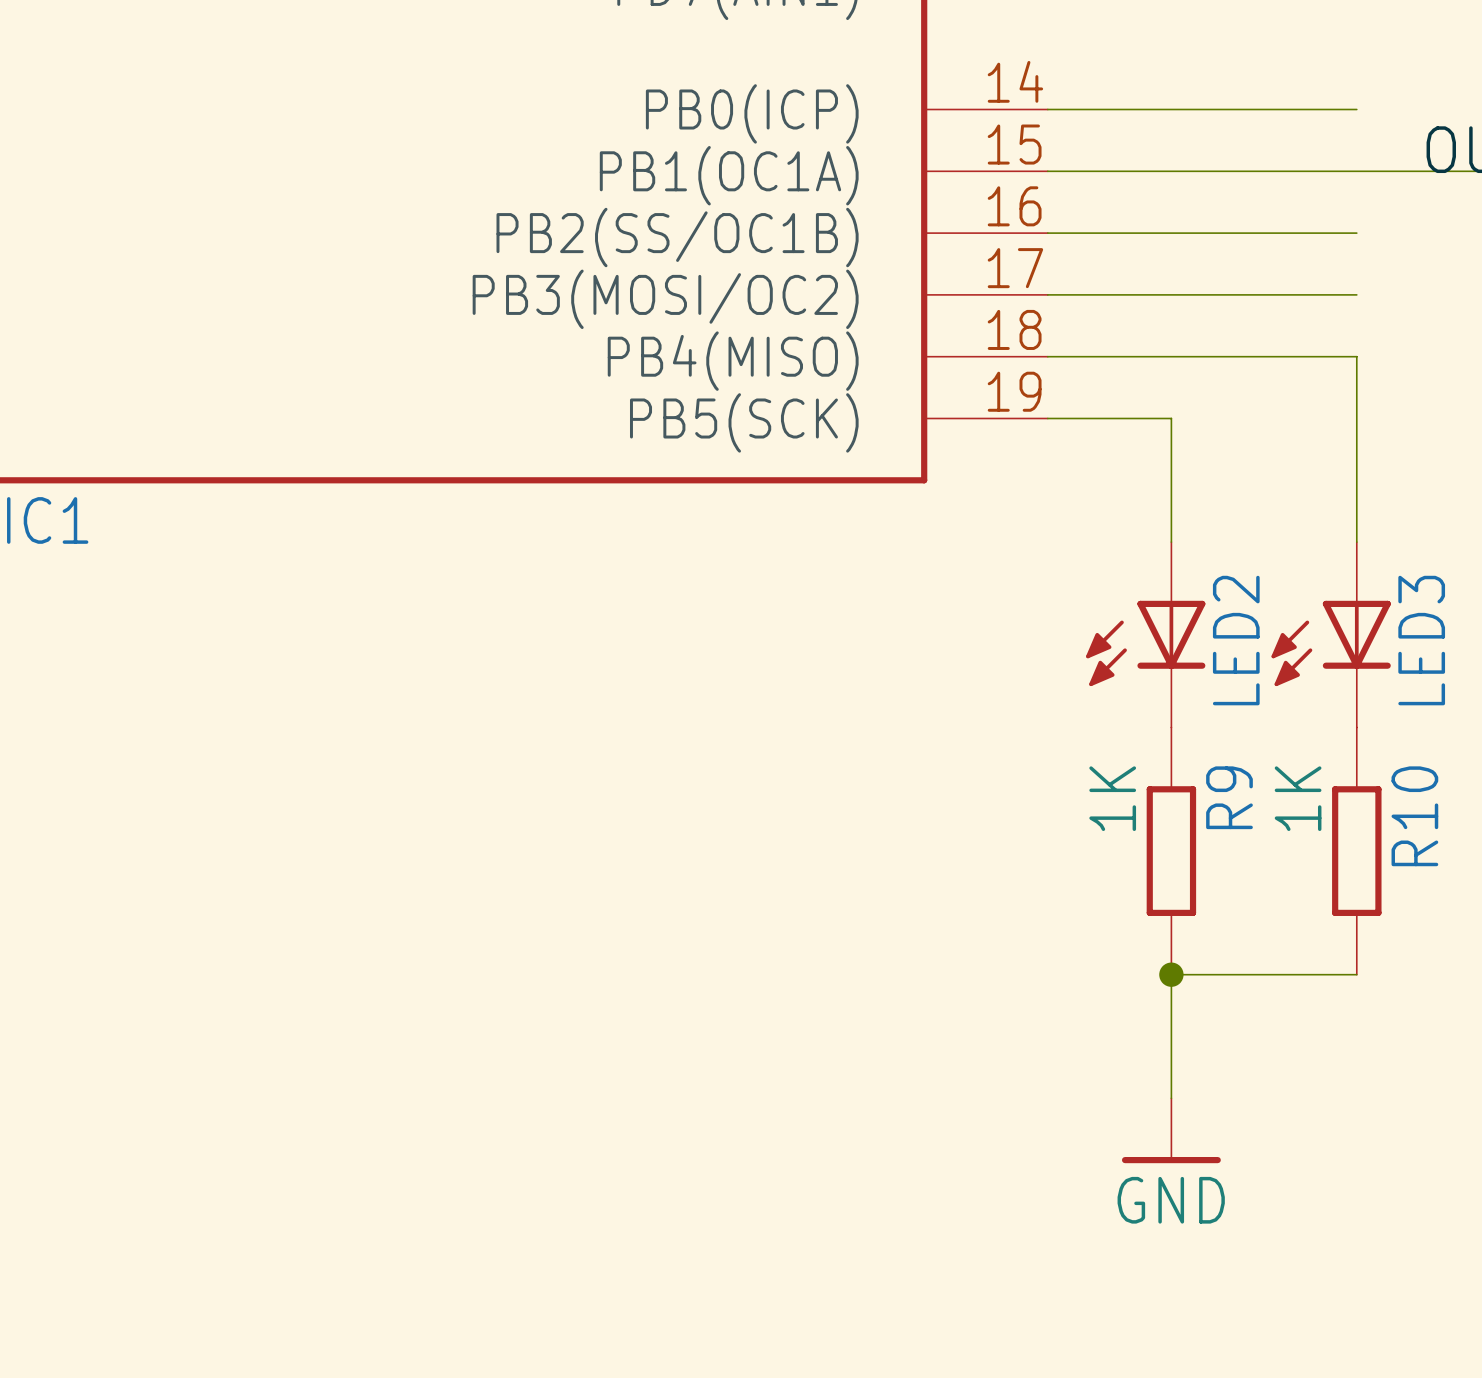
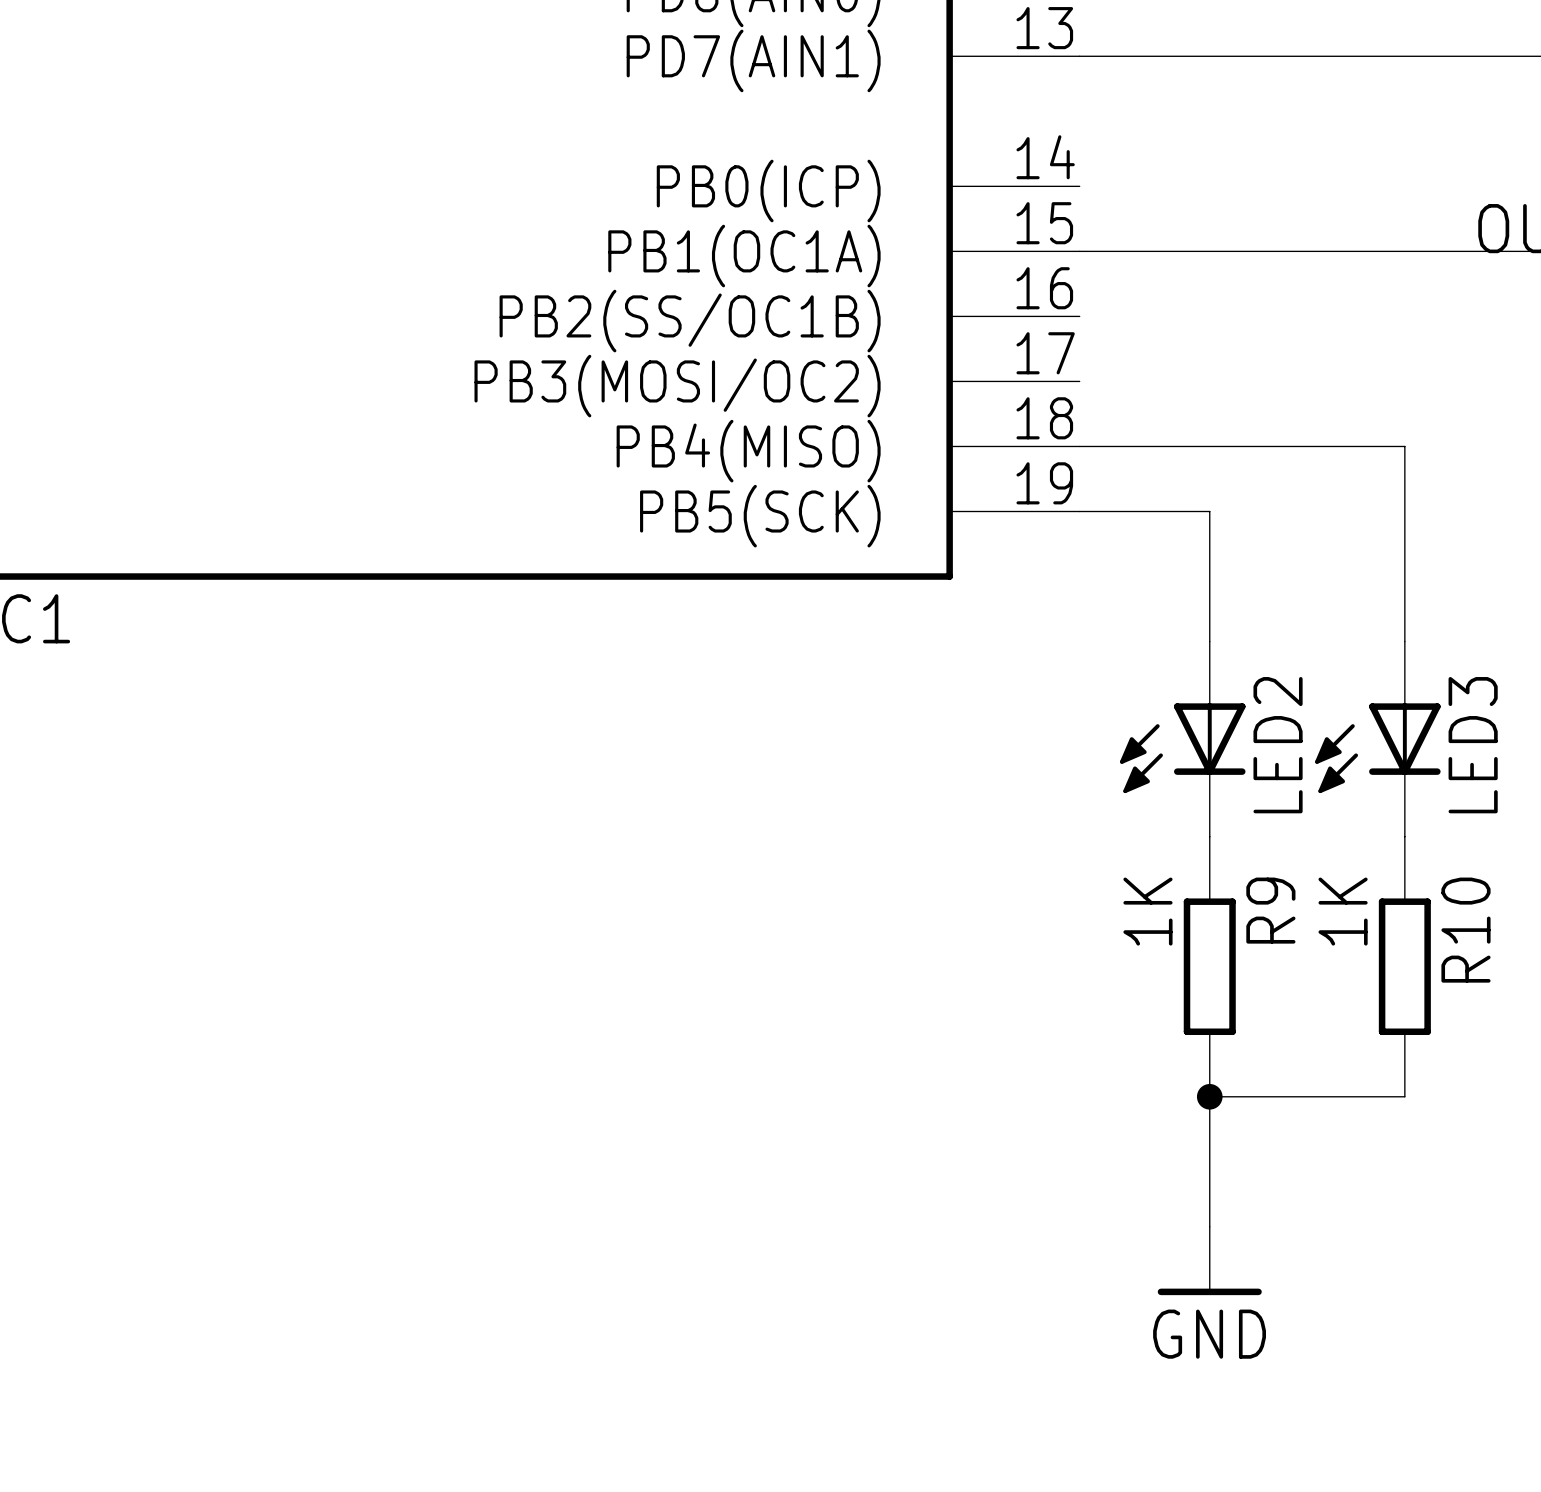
wire: (1047, 109) (1356, 109) -> none
wire: (1047, 233) (1356, 233) -> none
wire: (1047, 294) (1356, 294) -> none

